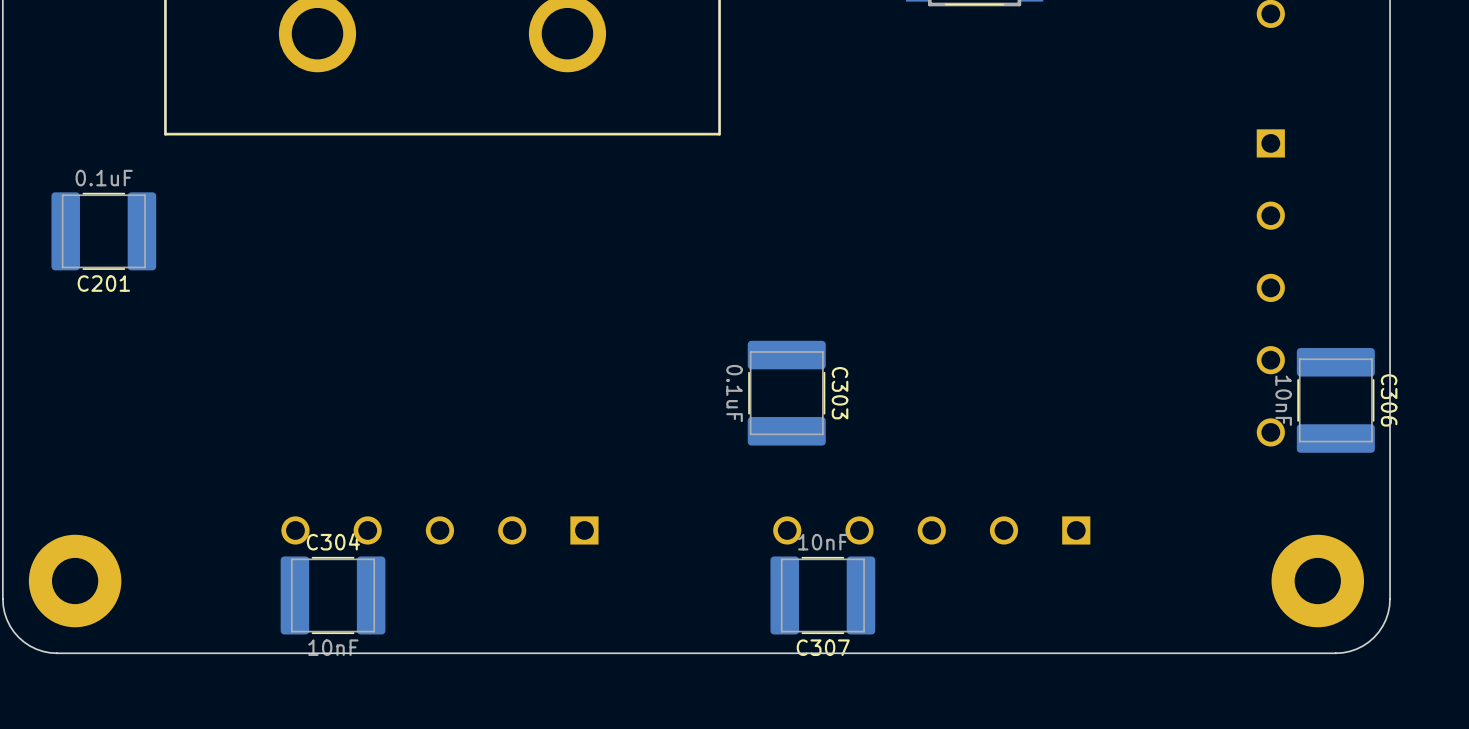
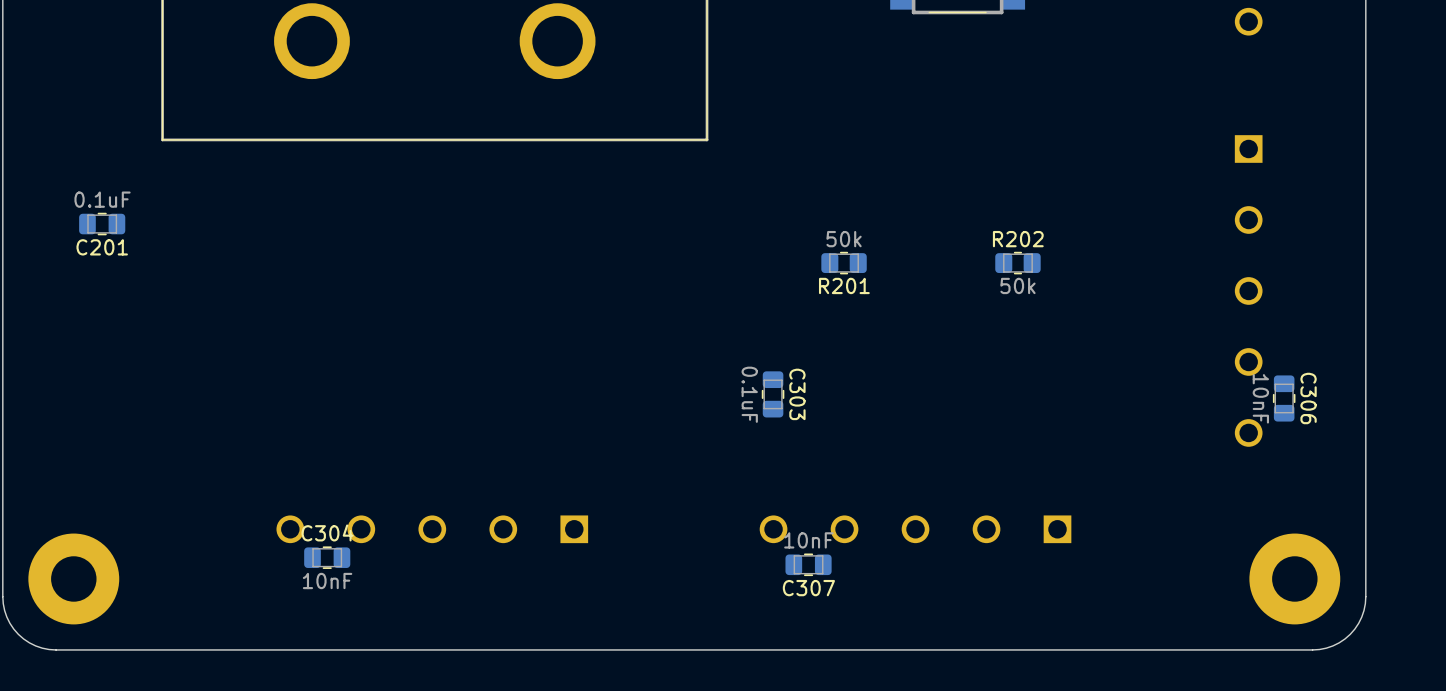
C201 footprint: [51, 192, 157, 271] -> [79, 212, 126, 236]
R201: none -> 50k (844, 263)
R202: none -> 50k (1017, 263)
C303 footprint: [747, 340, 826, 446] -> [761, 371, 785, 418]
C306 footprint: [1296, 348, 1375, 453] -> [1272, 375, 1296, 422]
C304 footprint: [280, 556, 386, 635] -> [304, 546, 351, 569]
C307 footprint: [770, 556, 876, 635] -> [785, 553, 832, 577]

